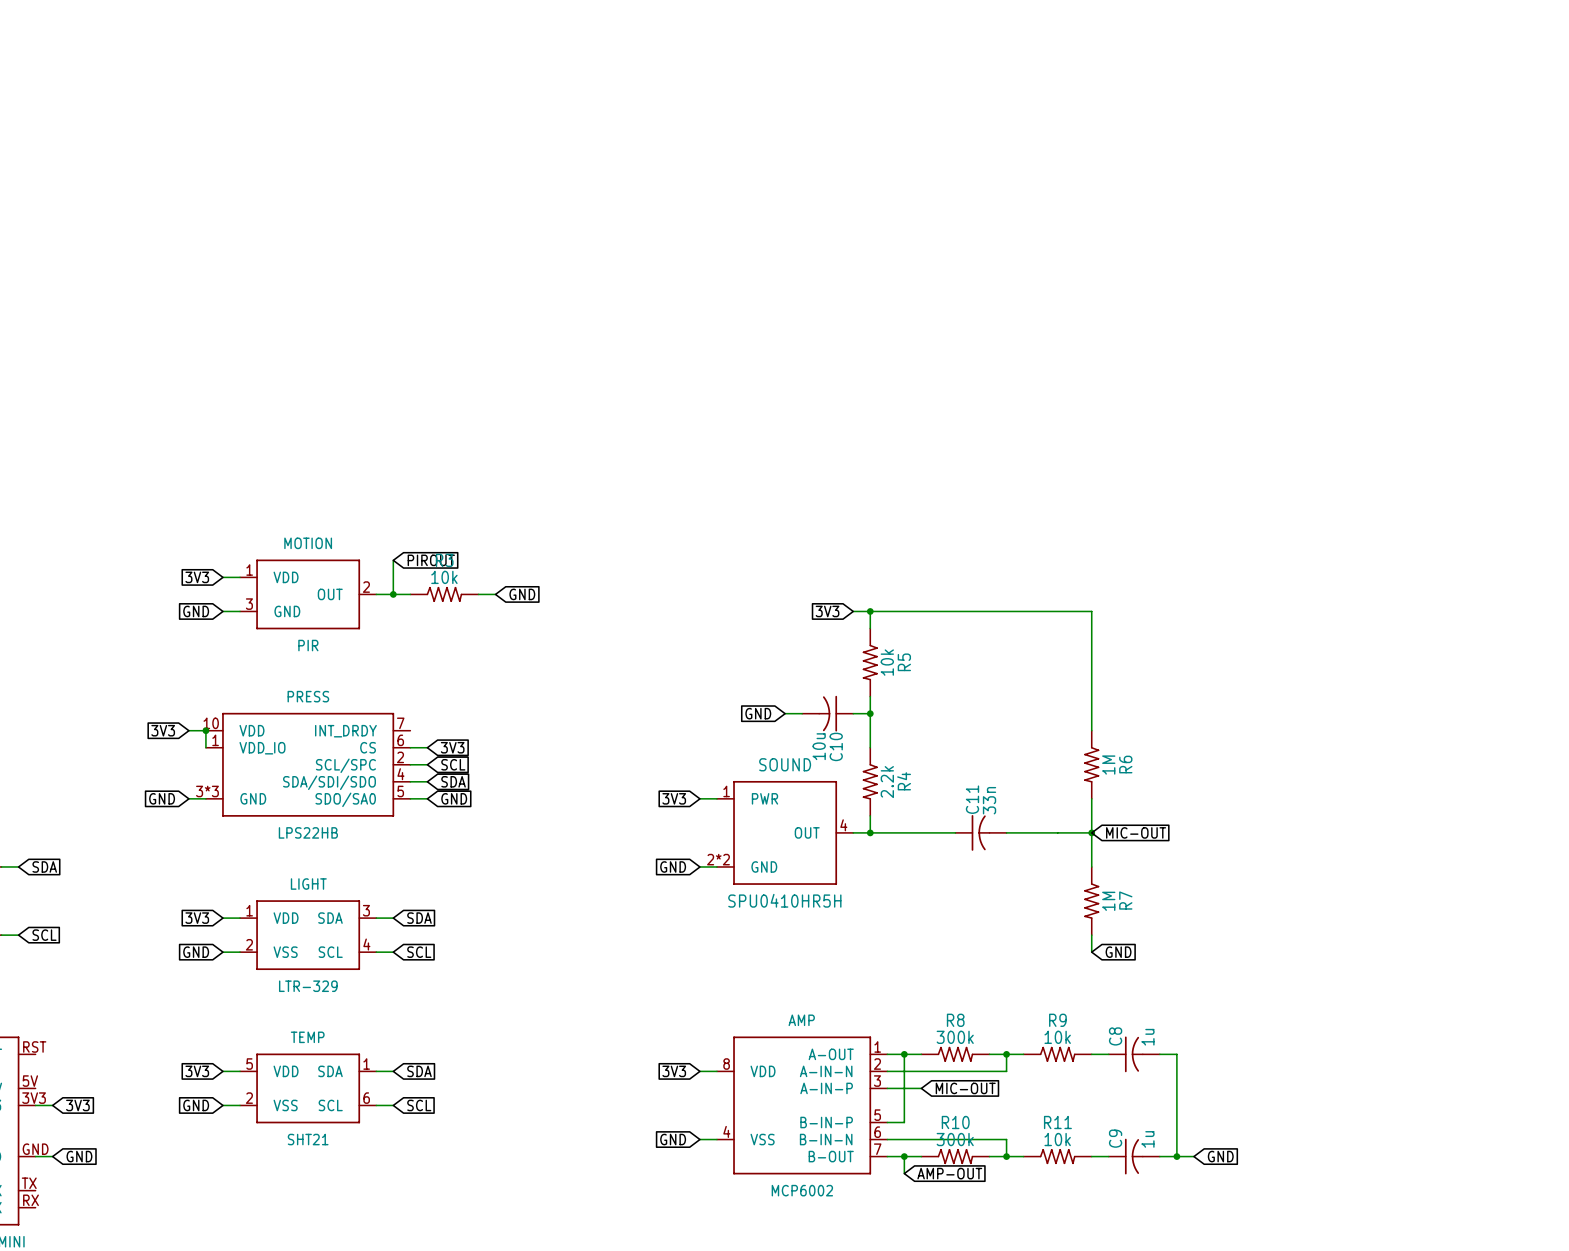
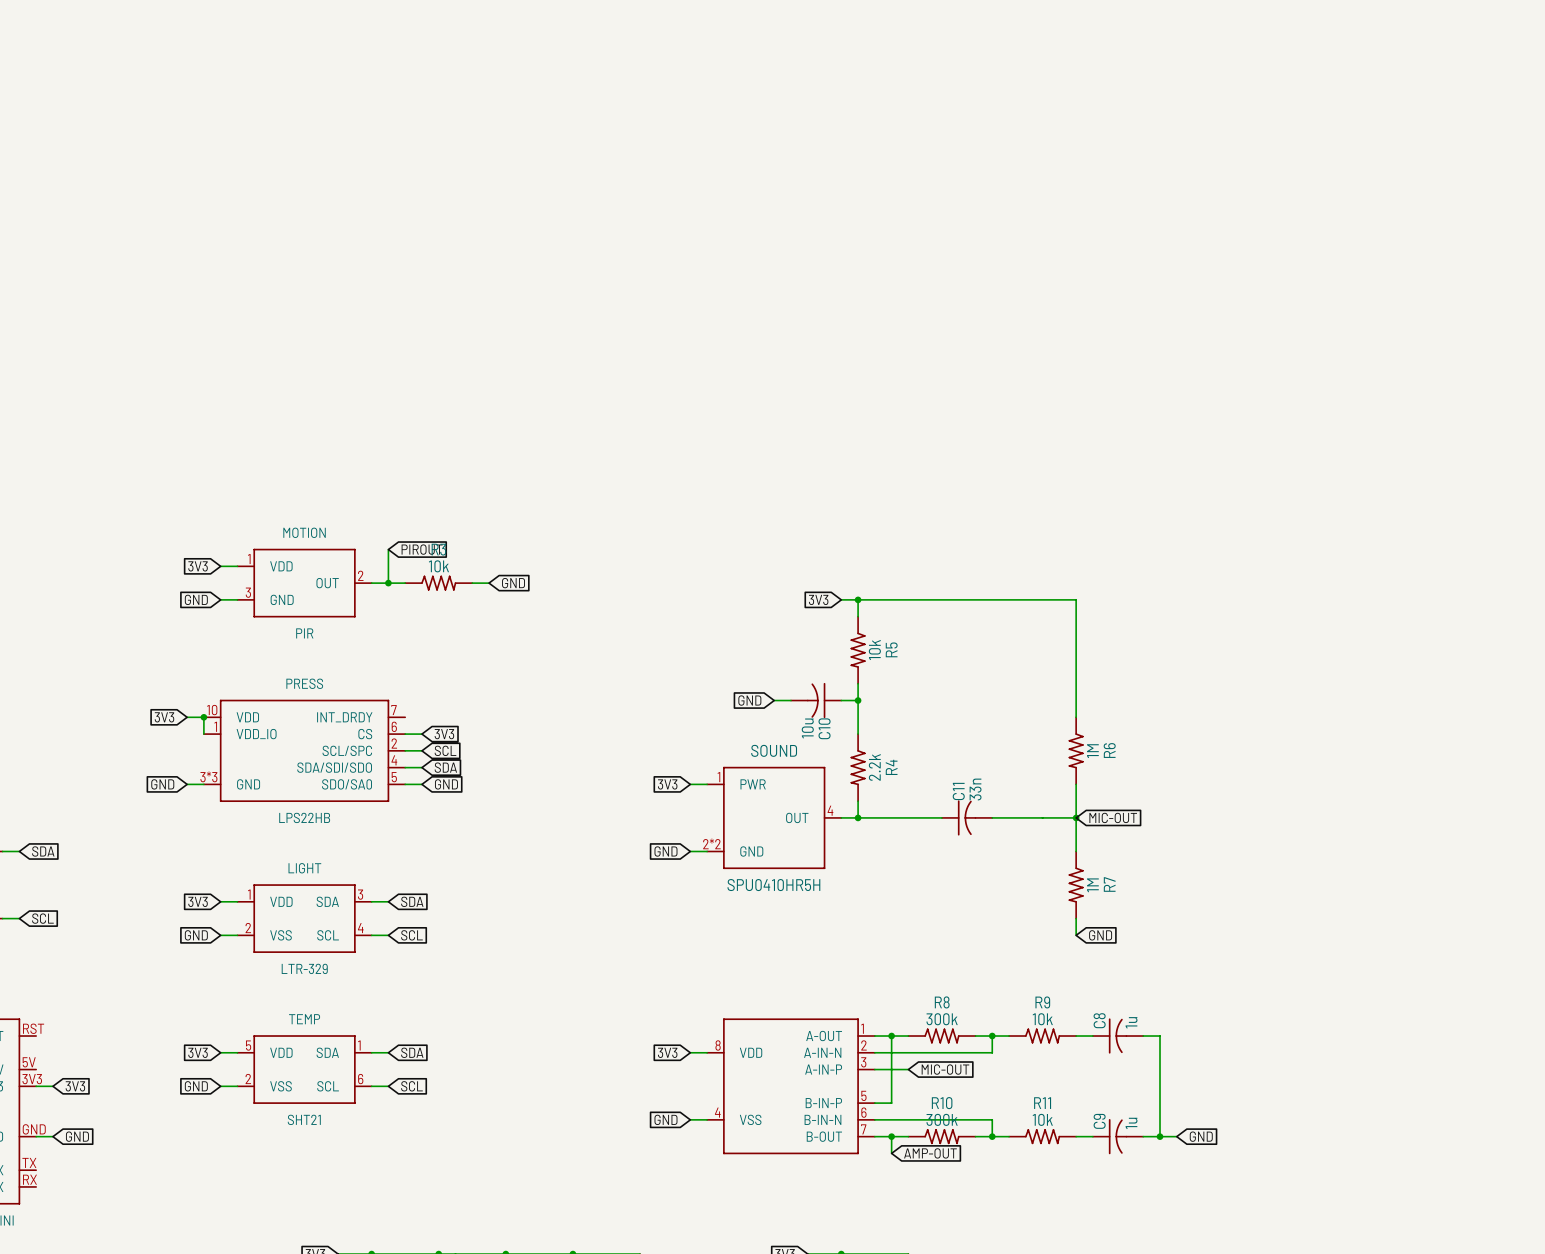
AMP name: AMP (801, 1020) -> none
AMP value: MCP6002 (802, 1190) -> none

